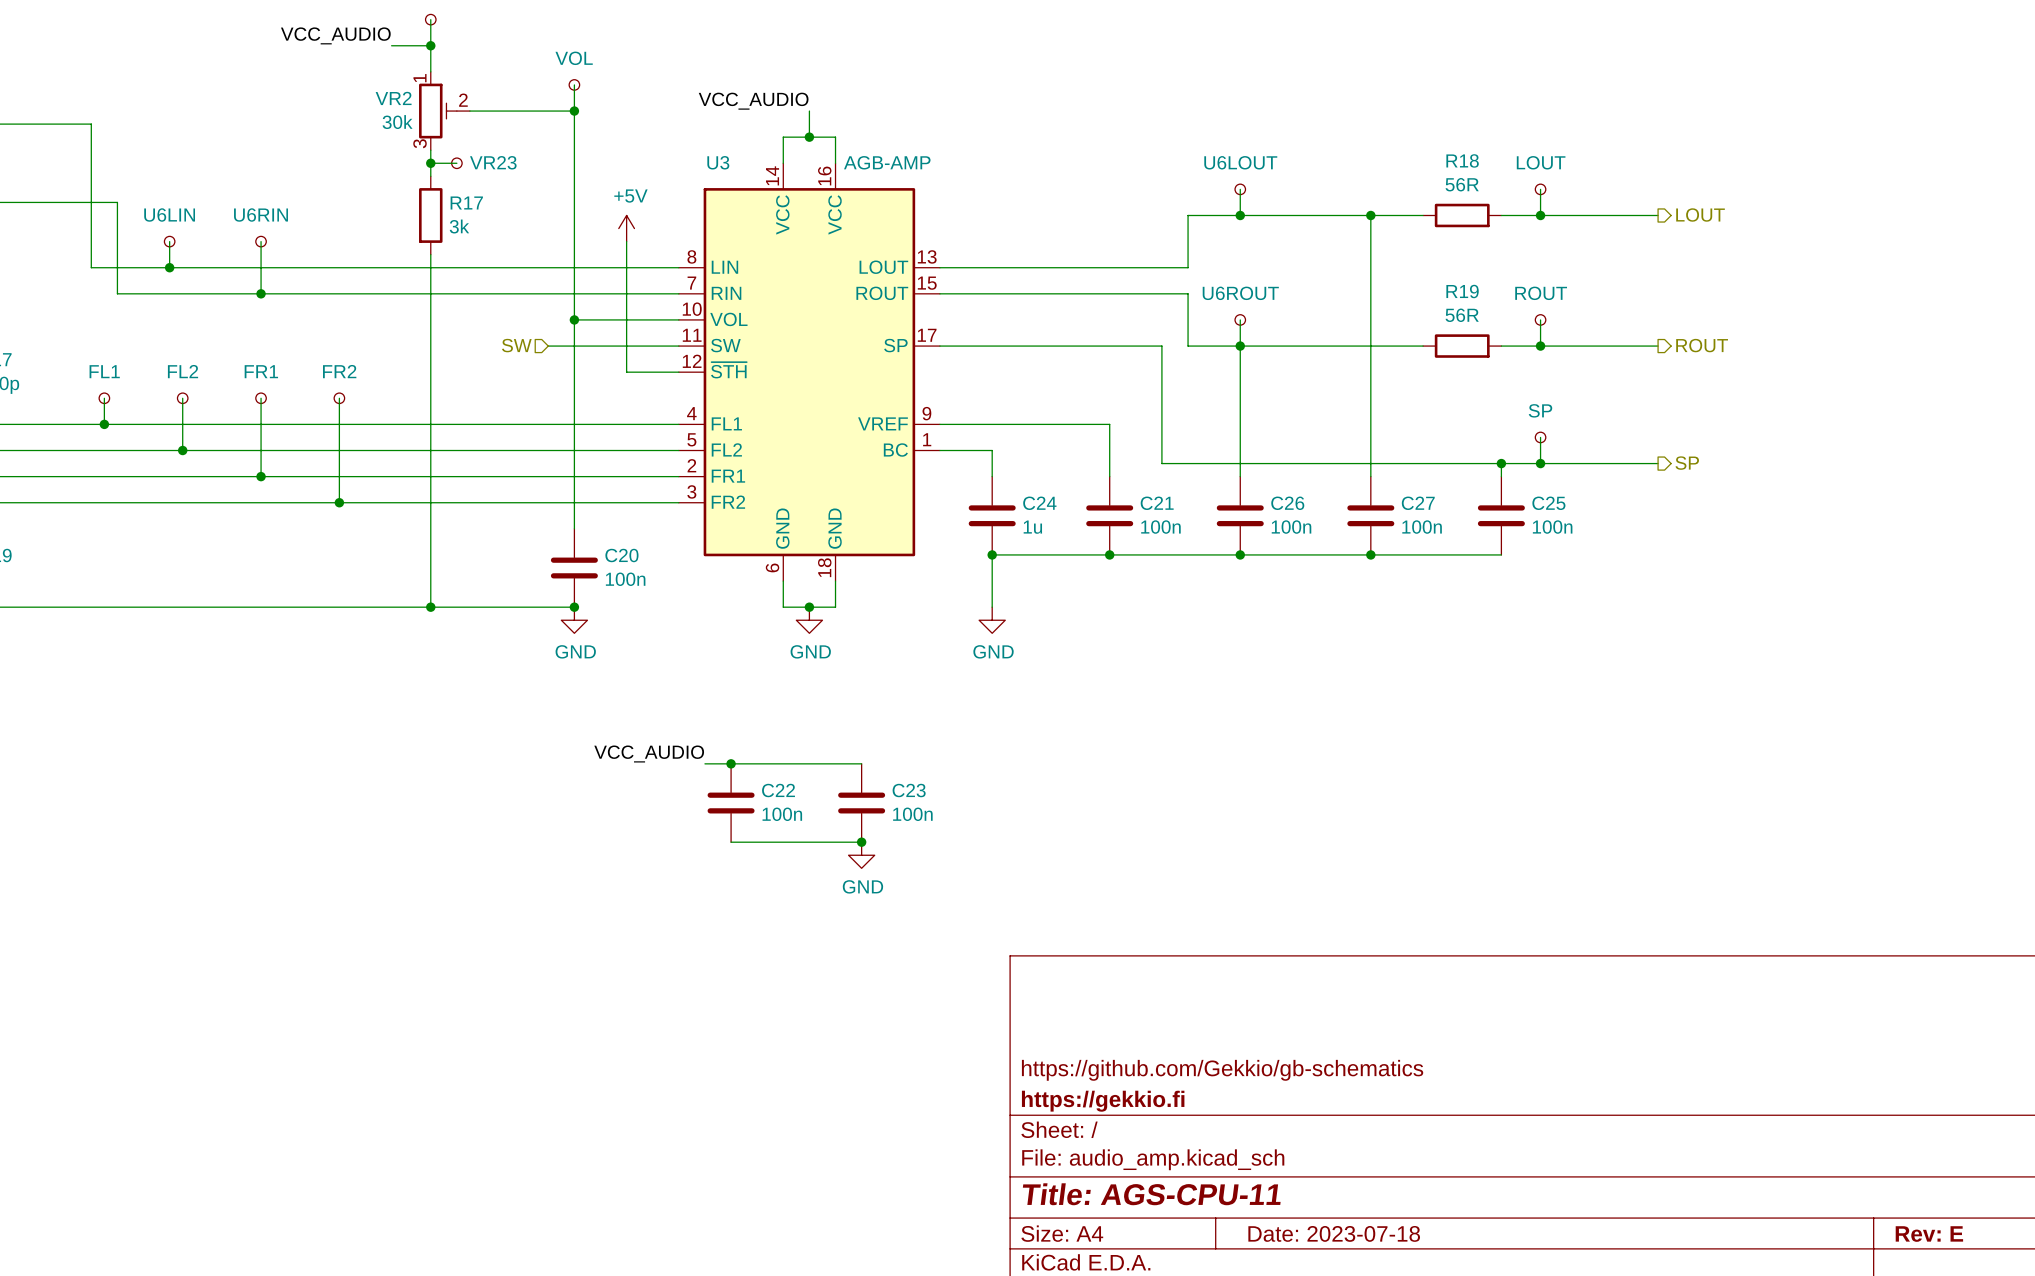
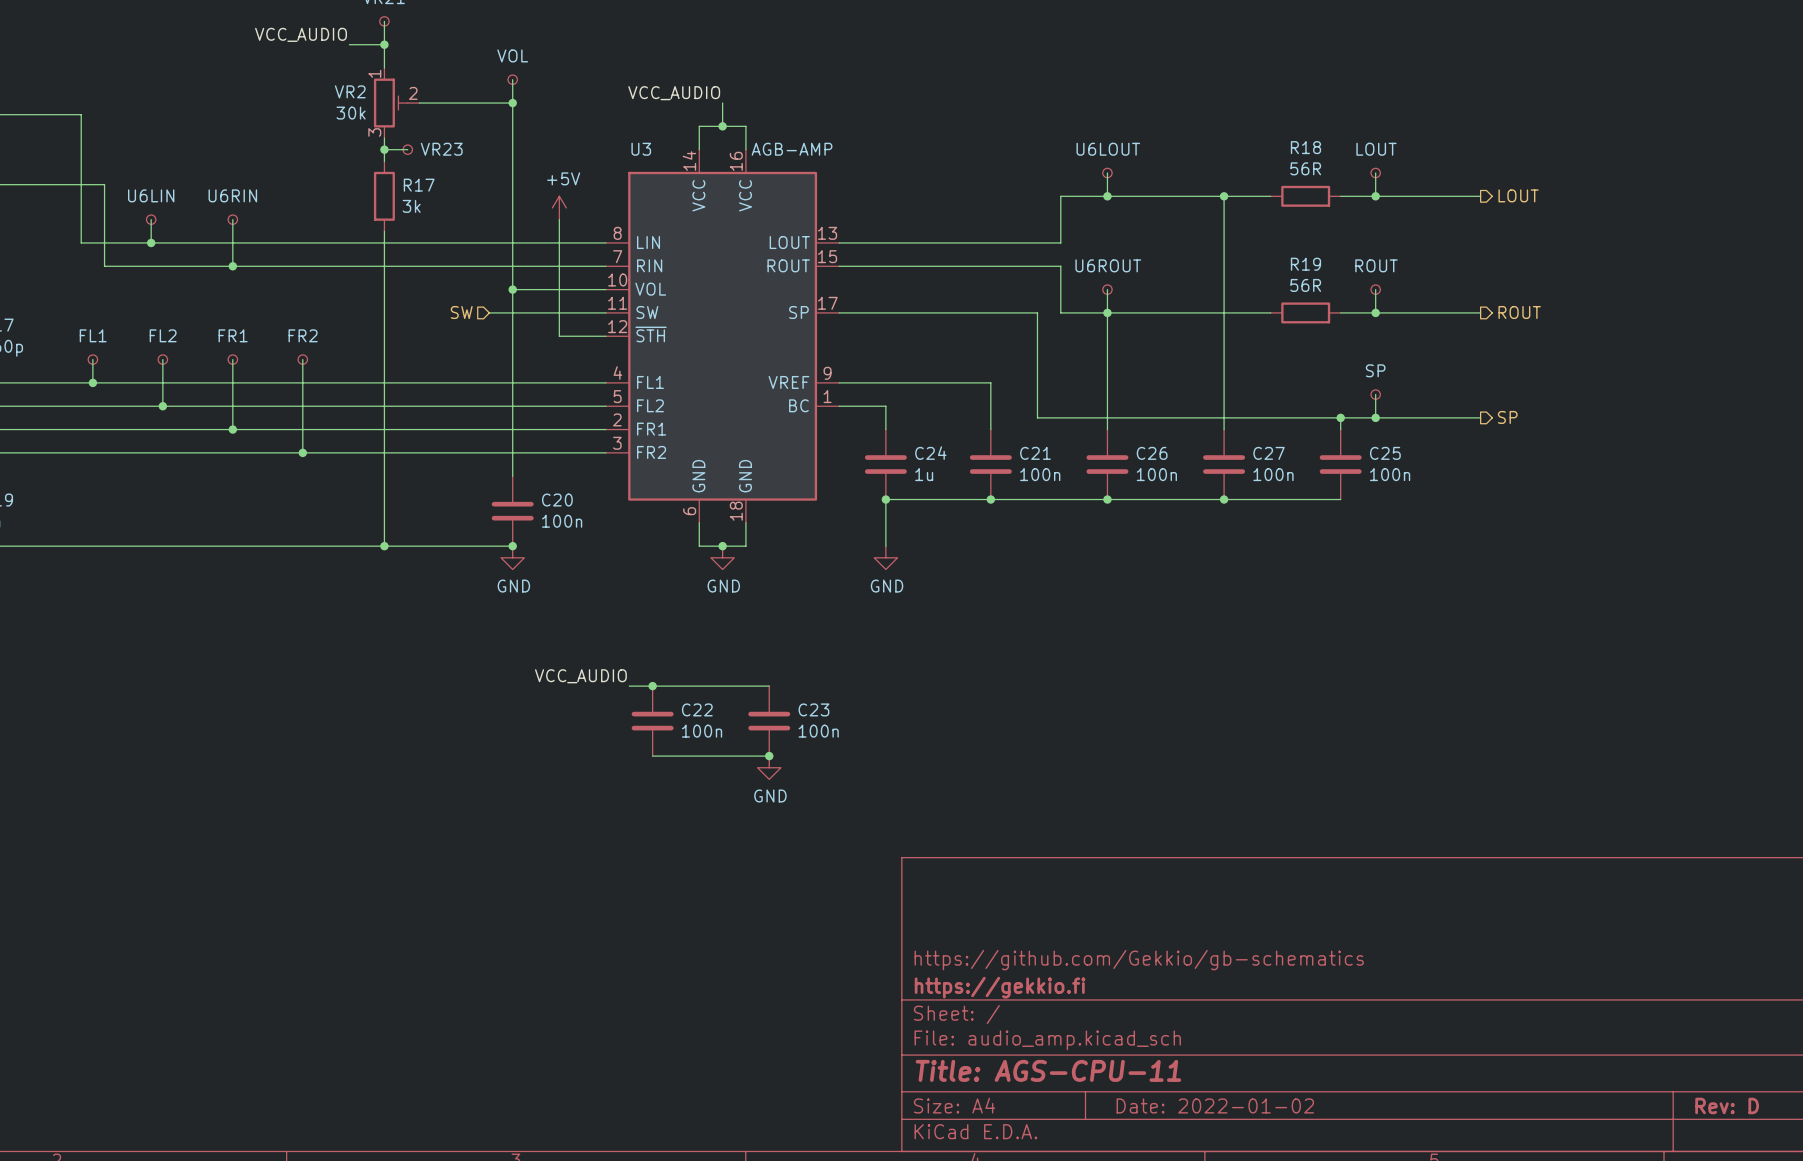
title block: Date: 2023-07-18 (1334, 1233) -> Date: 2022-01-02 (1215, 1105)
title block: Rev: E (1929, 1234) -> Rev: D (1727, 1105)

